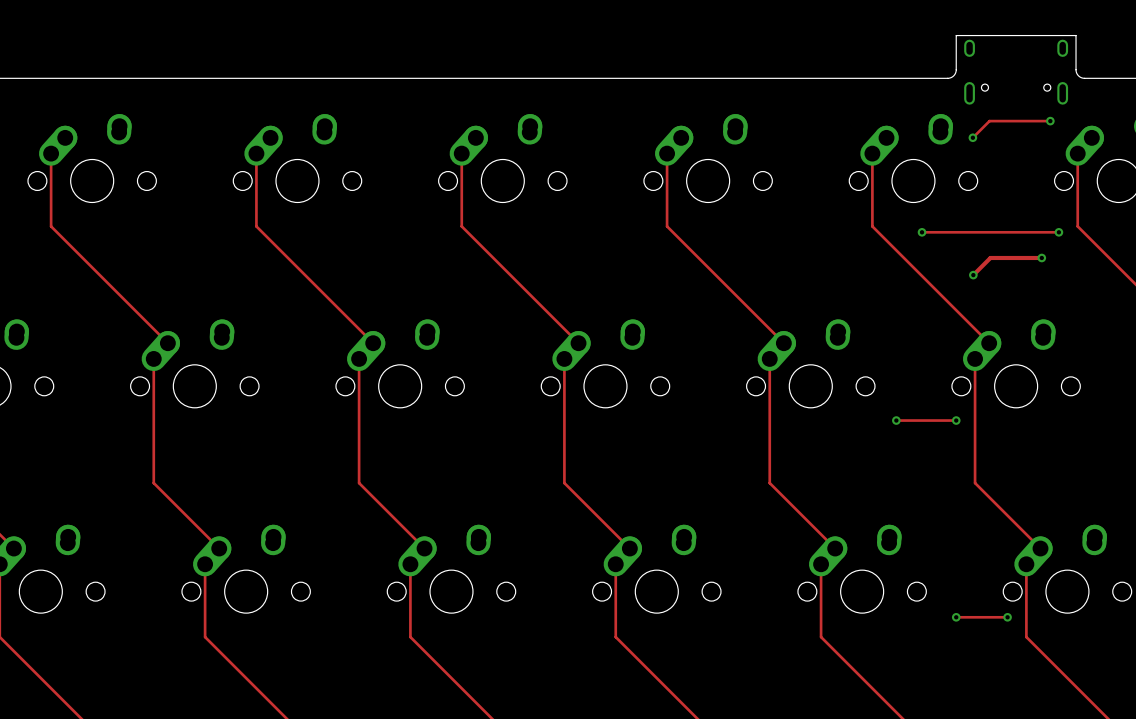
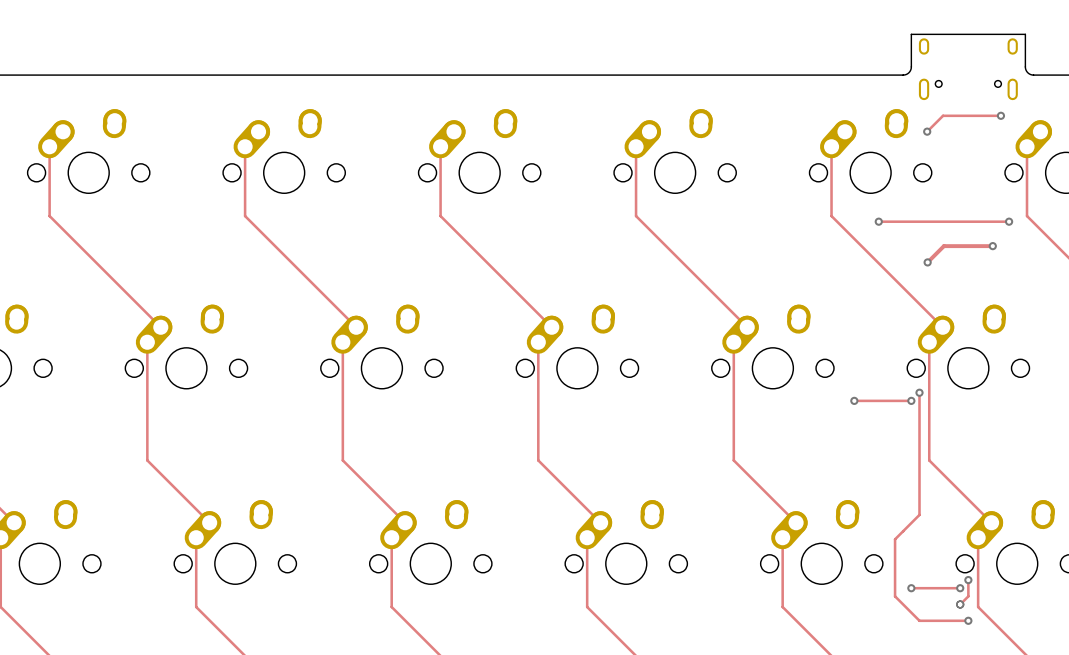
track: none -> (919, 392) (919, 514) (895, 539) (895, 596) (919, 620) (968, 620)
via: none -> (919, 392)
track: none -> (968, 580) (968, 596) (960, 604)
via: none -> (968, 580)
via: none -> (960, 604)
via: none -> (968, 620)

